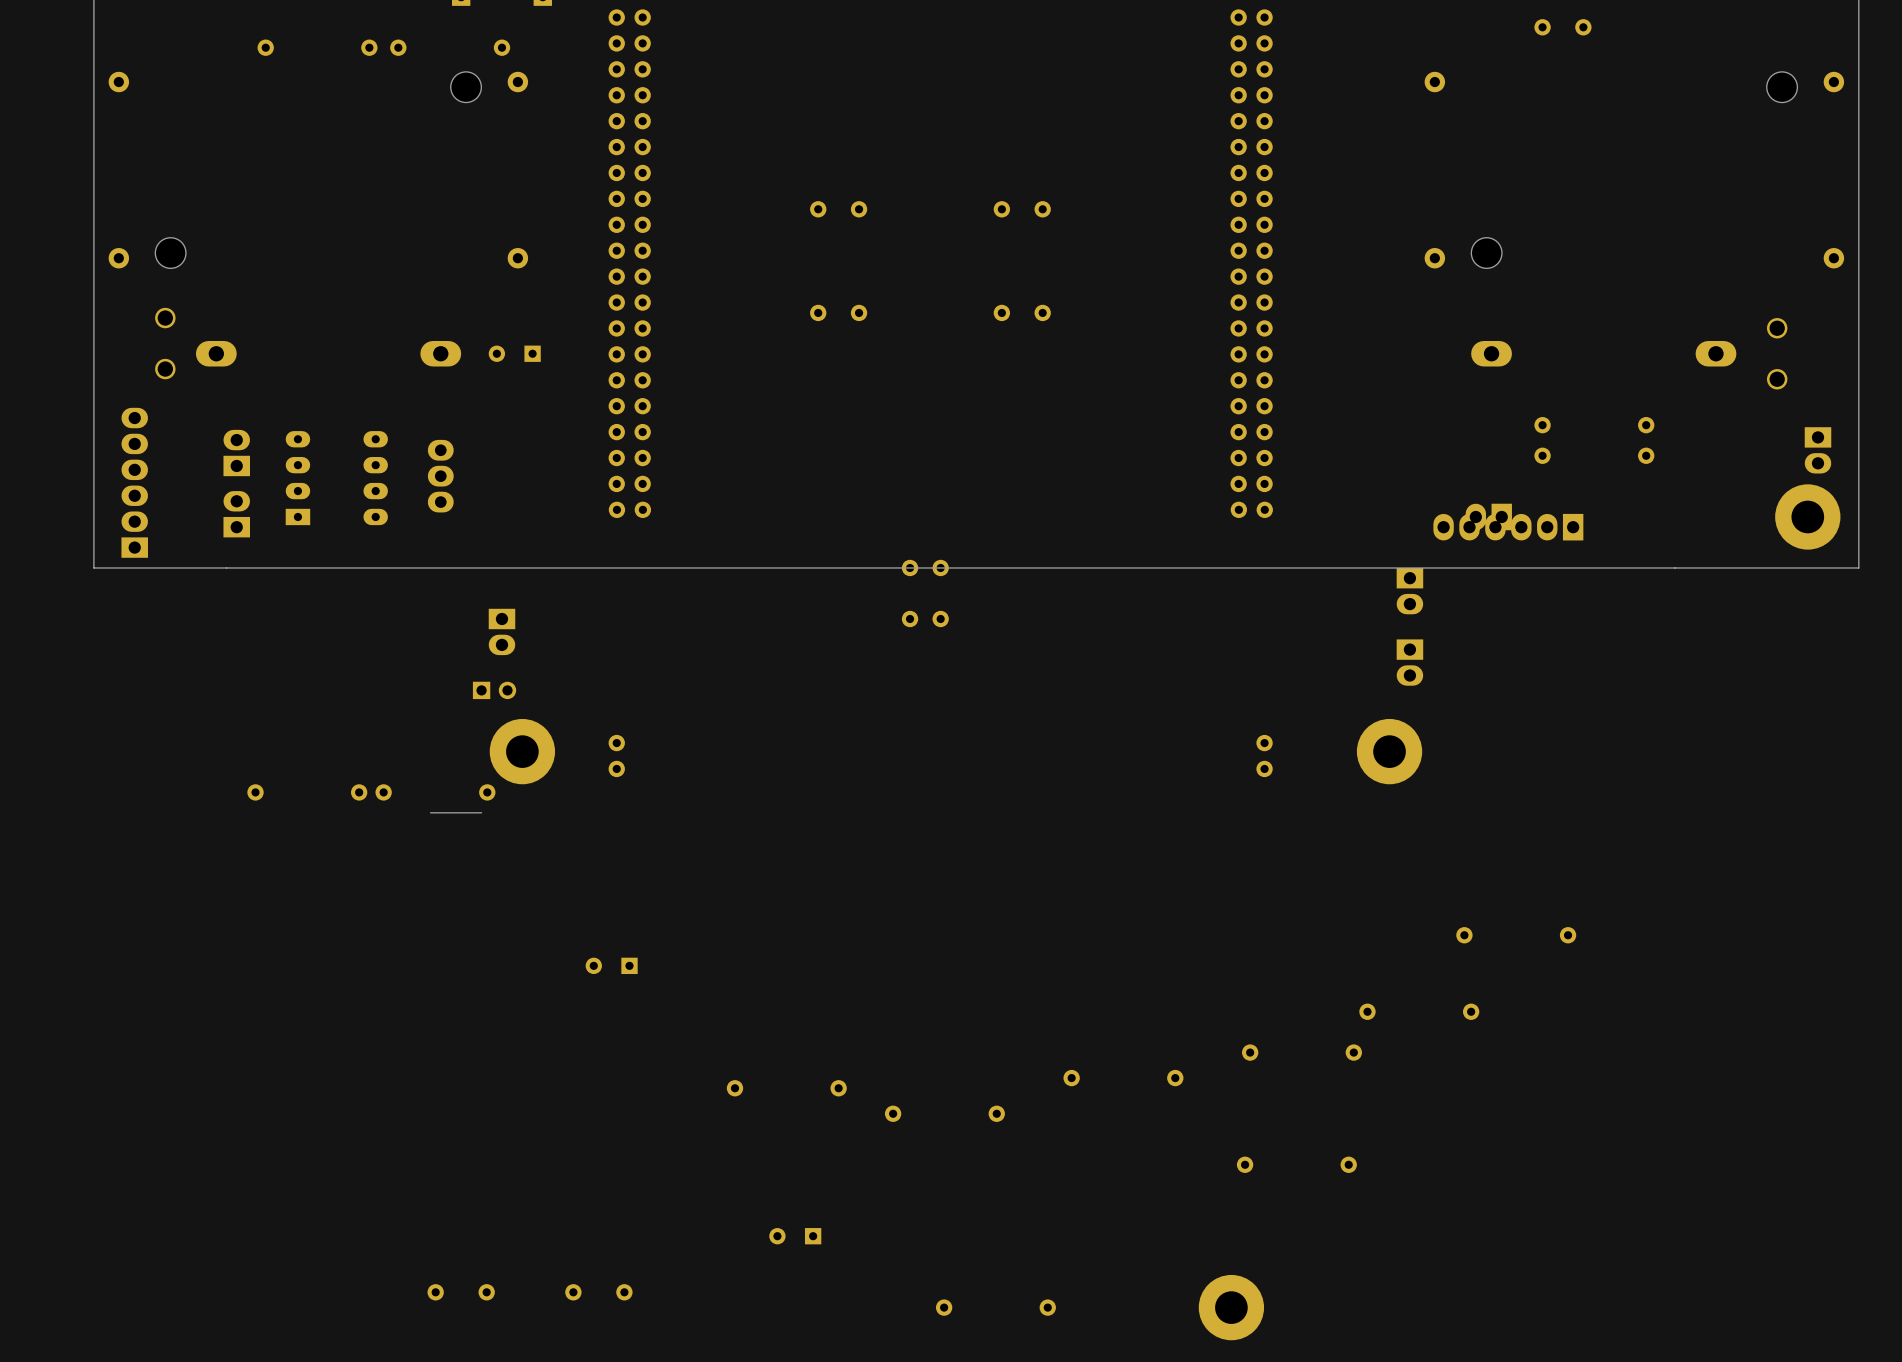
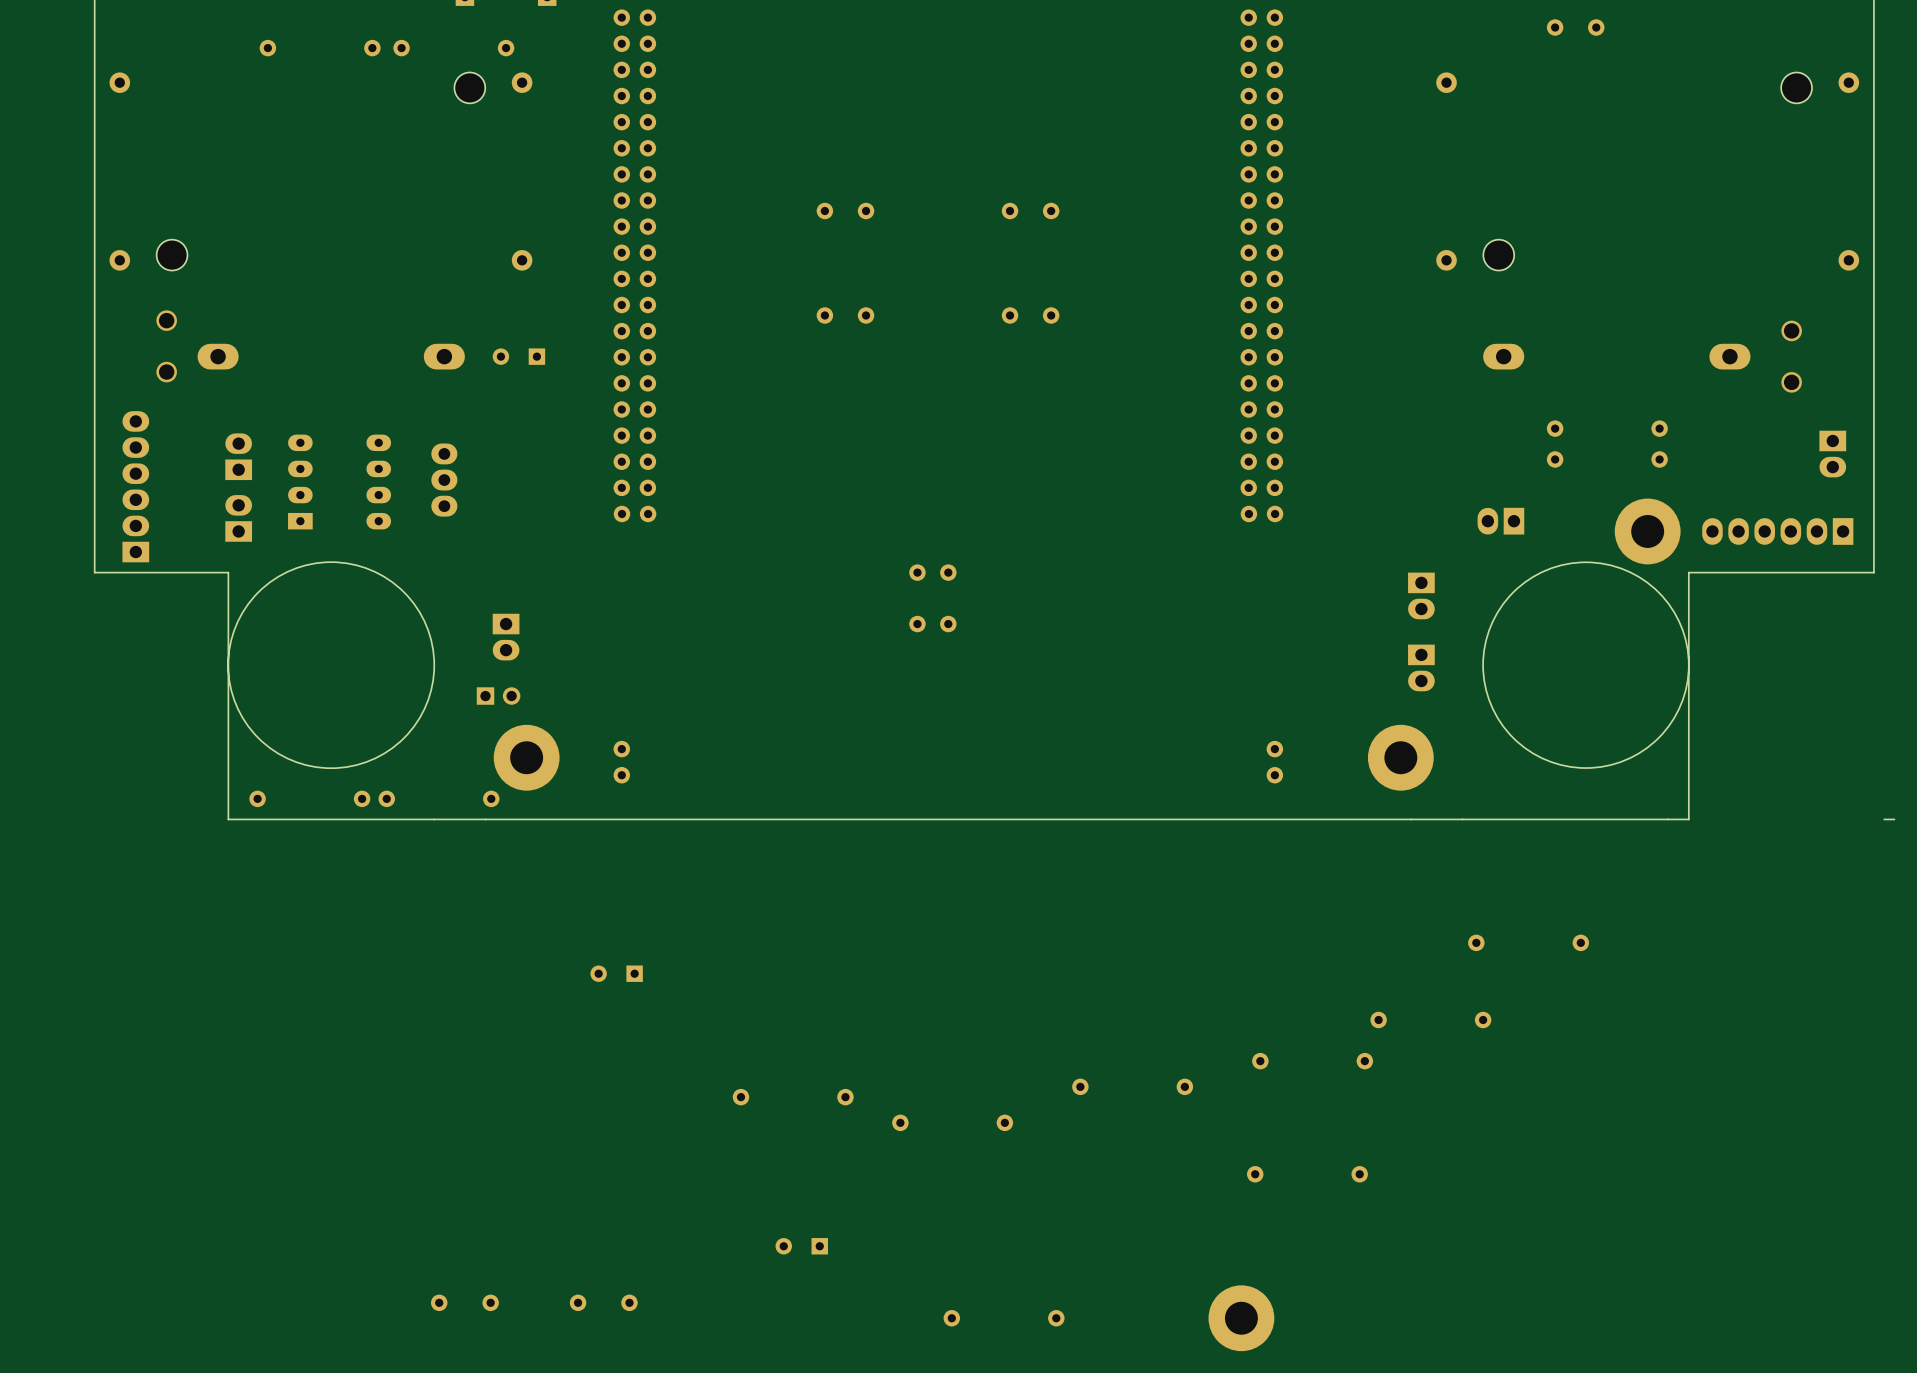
part position: (1807, 516) -> (1647, 531)
part position: (1508, 527) -> (1777, 531)
round board edge: none -> [227, 561, 435, 769]
round board edge: none -> [1482, 561, 1690, 769]
board edge: none -> (228, 572) (228, 819) (434, 819)
board edge: (1675, 567) (226, 567) -> (1688, 572) (1688, 819) (485, 819)
board edge: none -> (1894, 819) (1884, 819)

